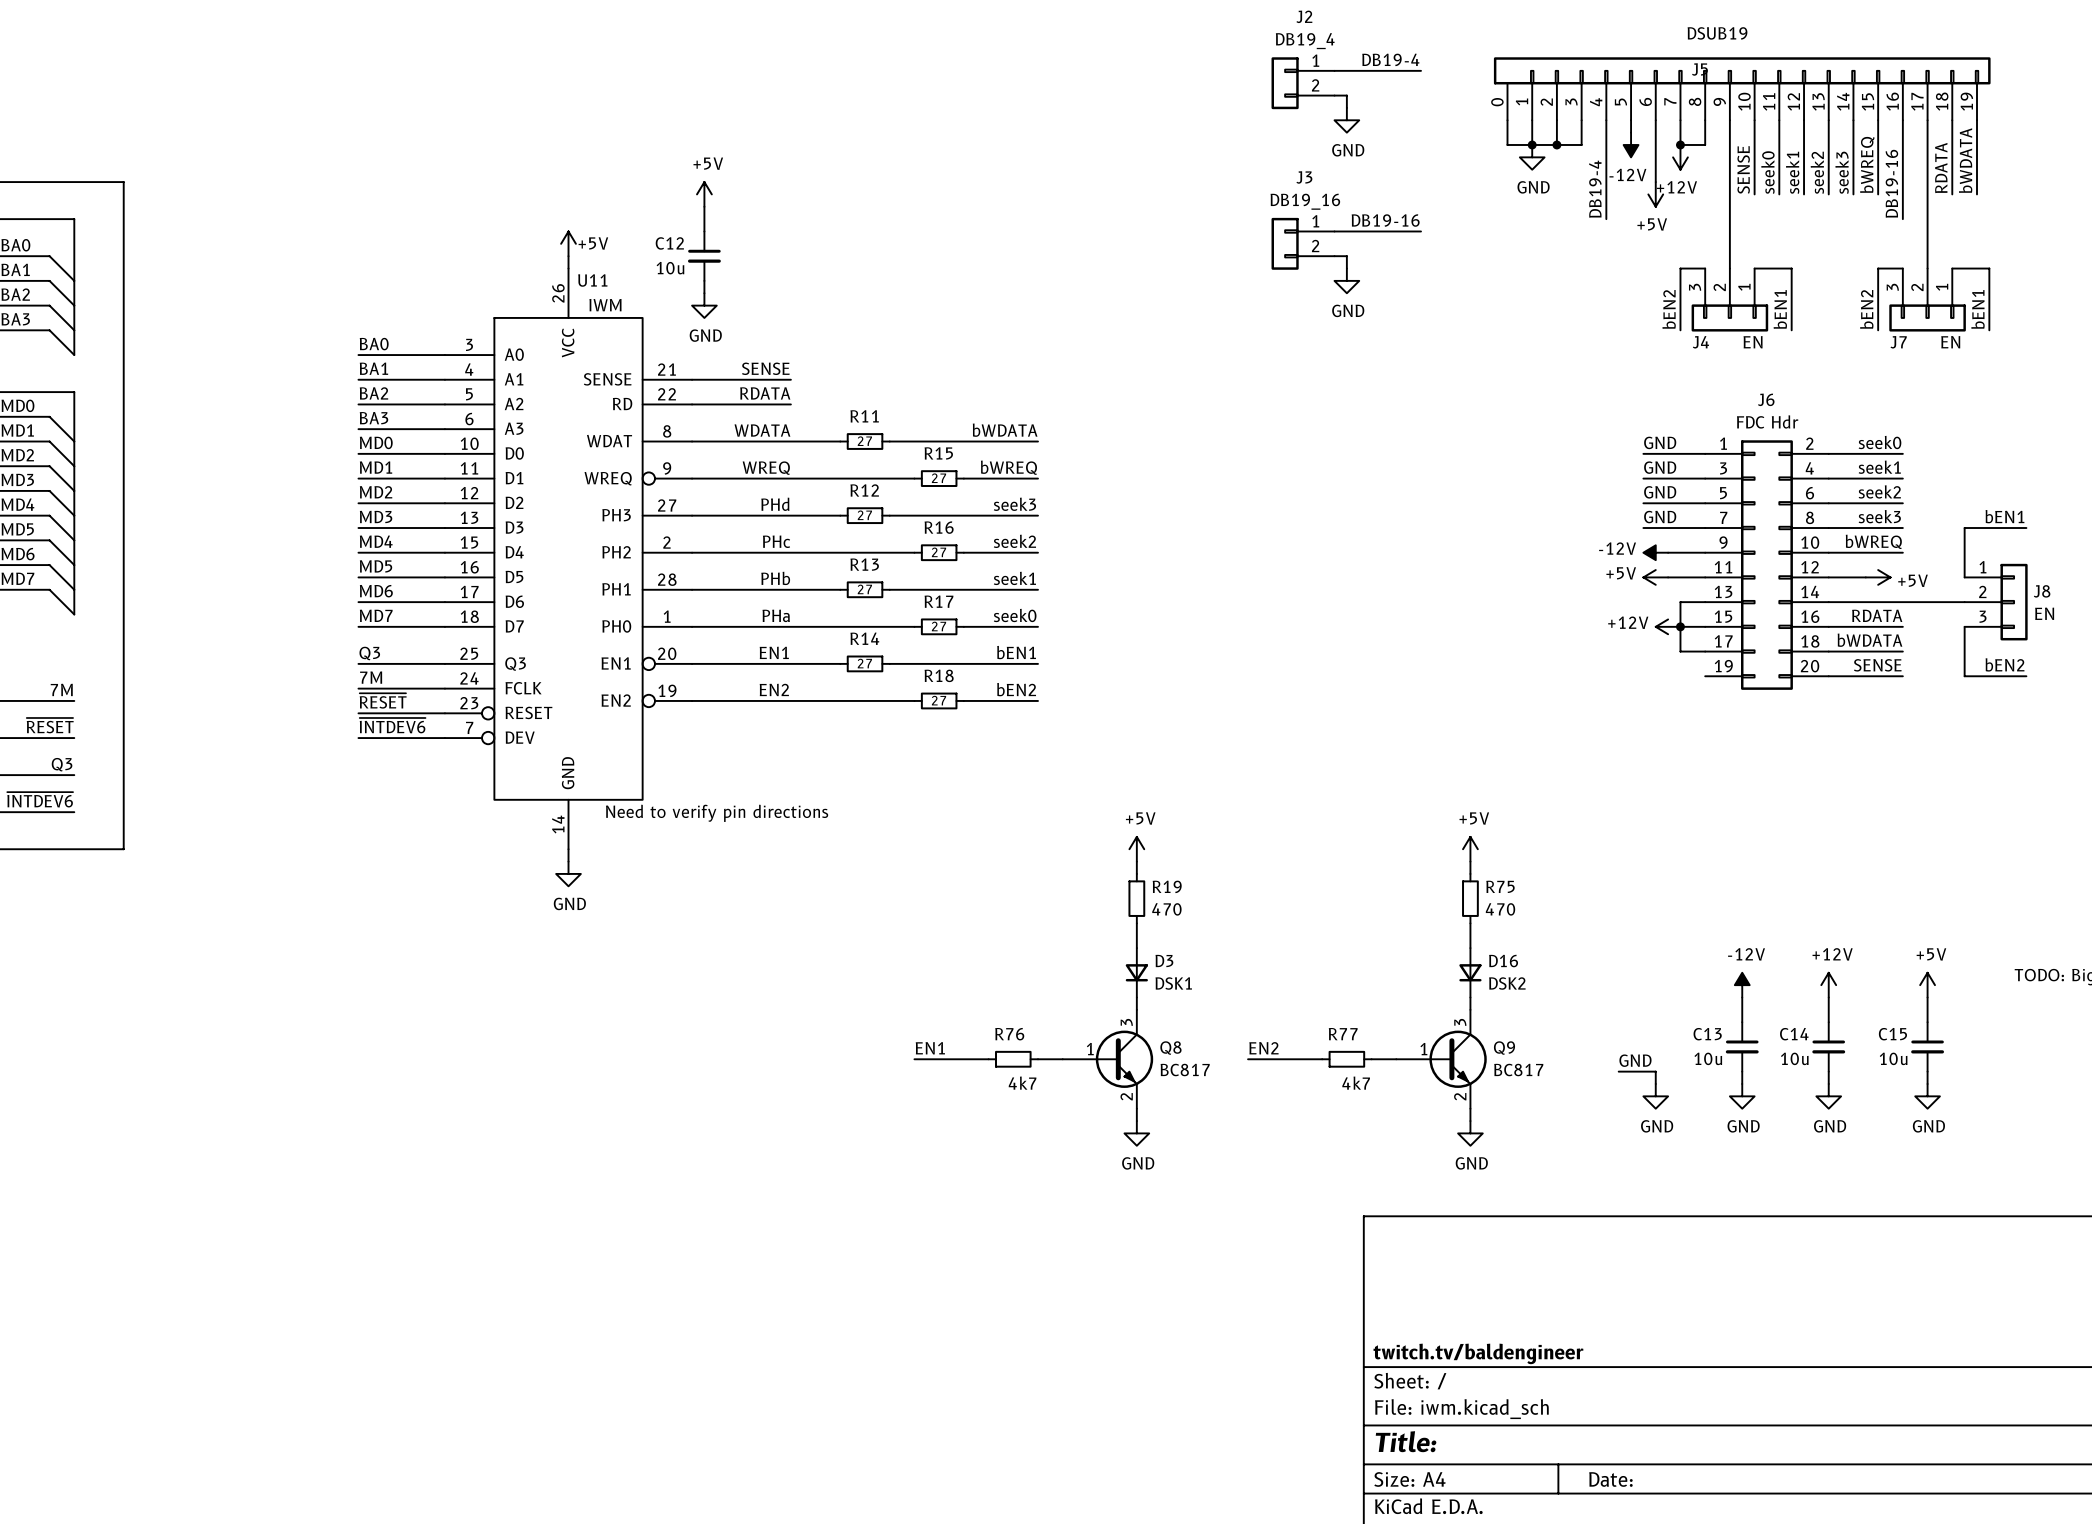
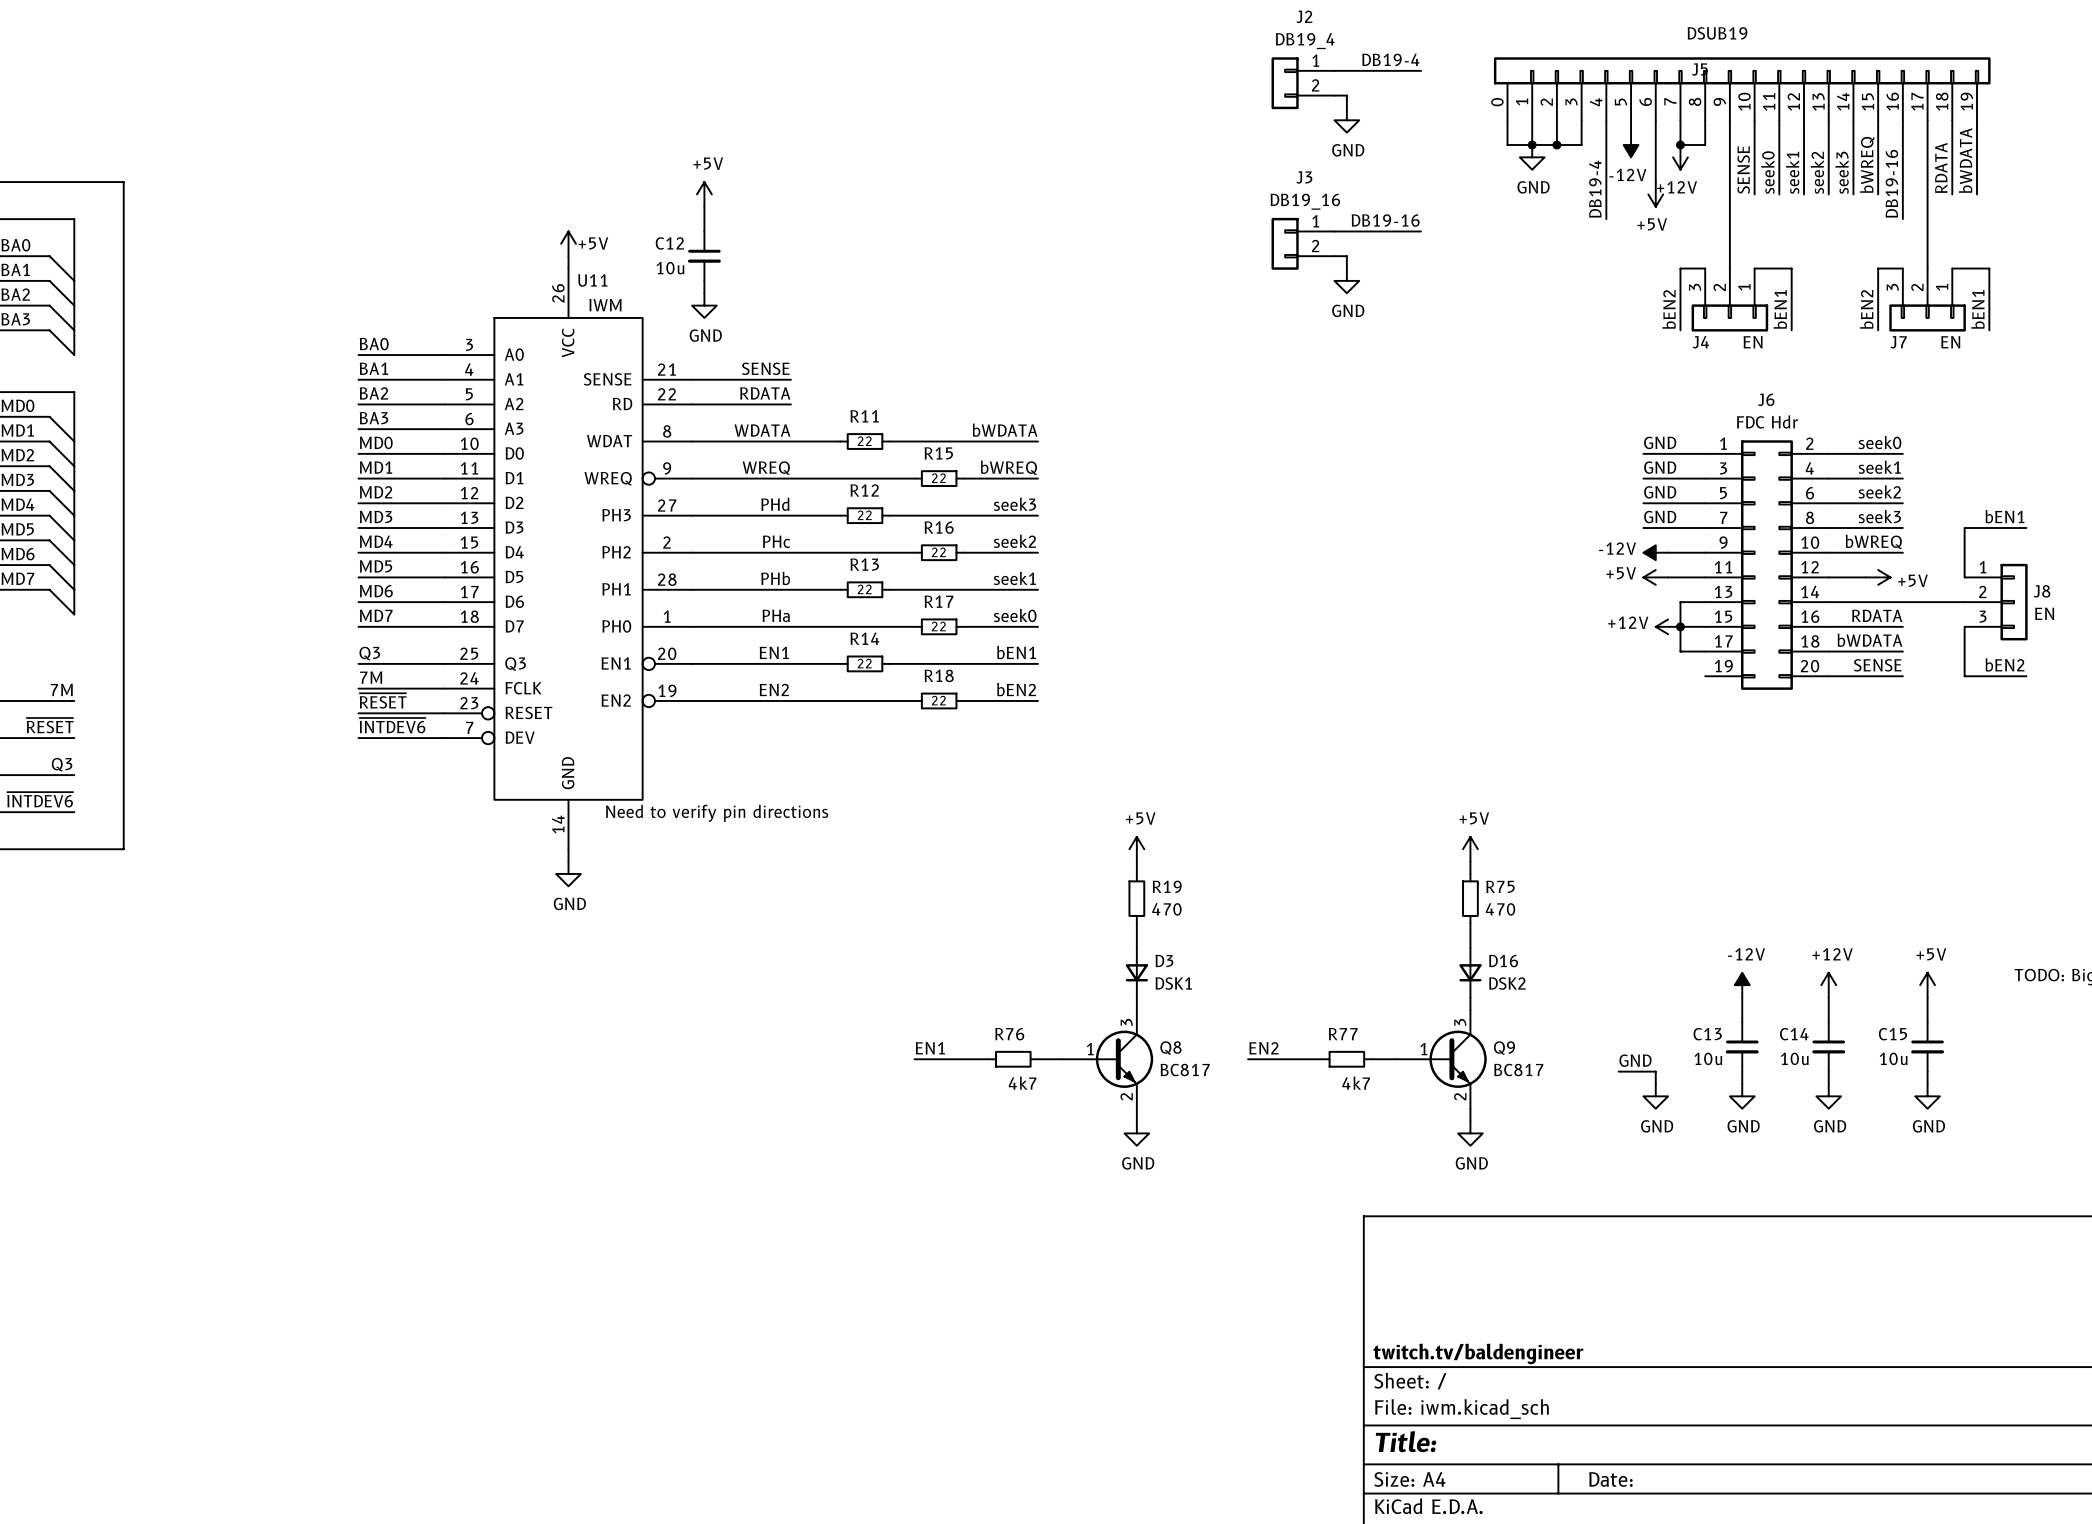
R11 value: 27 (864, 441) -> 22 (864, 441)
R15 value: 27 (939, 478) -> 22 (938, 478)
R12 value: 27 (864, 515) -> 22 (864, 515)
R16 value: 27 (939, 552) -> 22 (938, 552)
R13 value: 27 (864, 589) -> 22 (864, 589)
R17 value: 27 (939, 626) -> 22 (938, 626)
R14 value: 27 (864, 663) -> 22 (864, 663)
R18 value: 27 (939, 700) -> 22 (938, 700)

